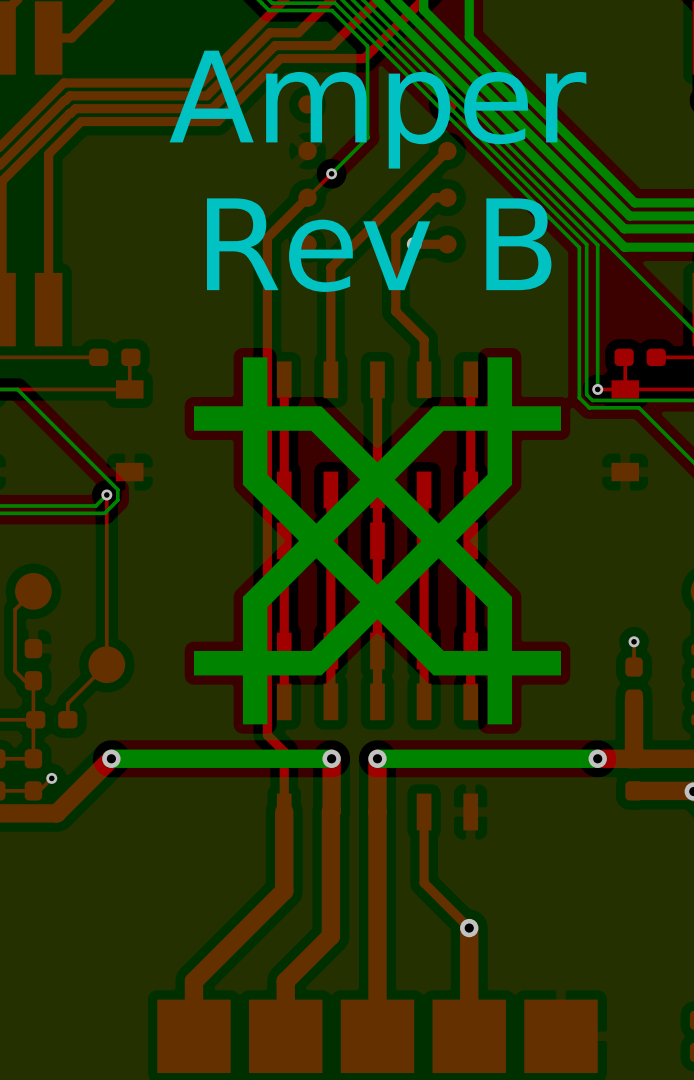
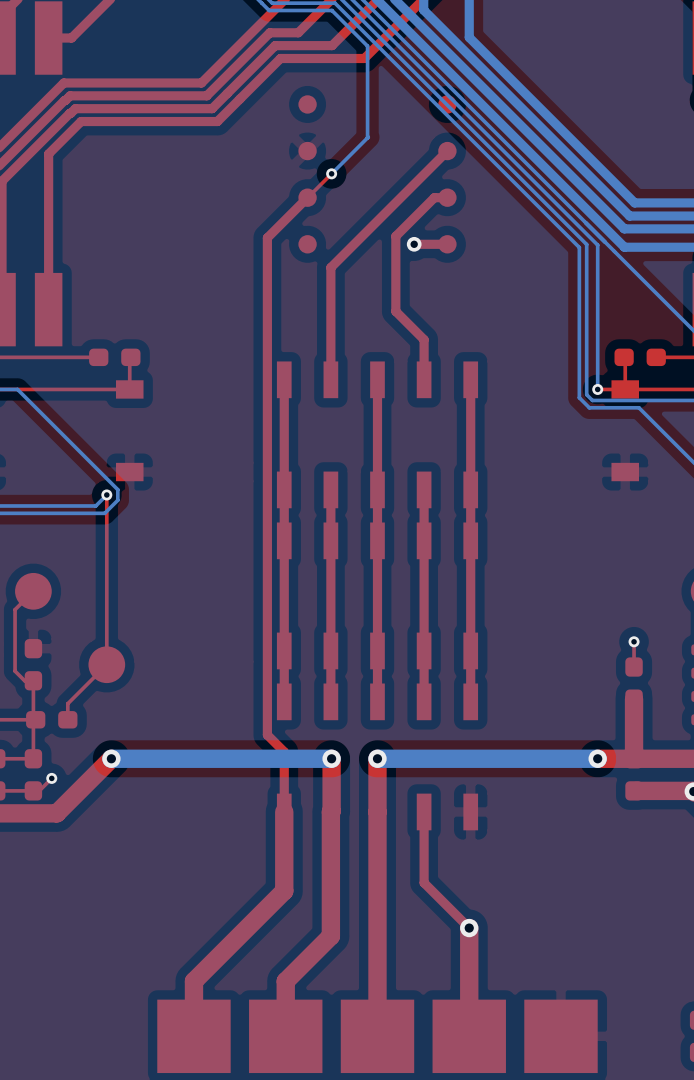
text: Amper (377, 109) -> none
text: Rev B (379, 245) -> none
drawing: [193, 357, 562, 725] -> none

